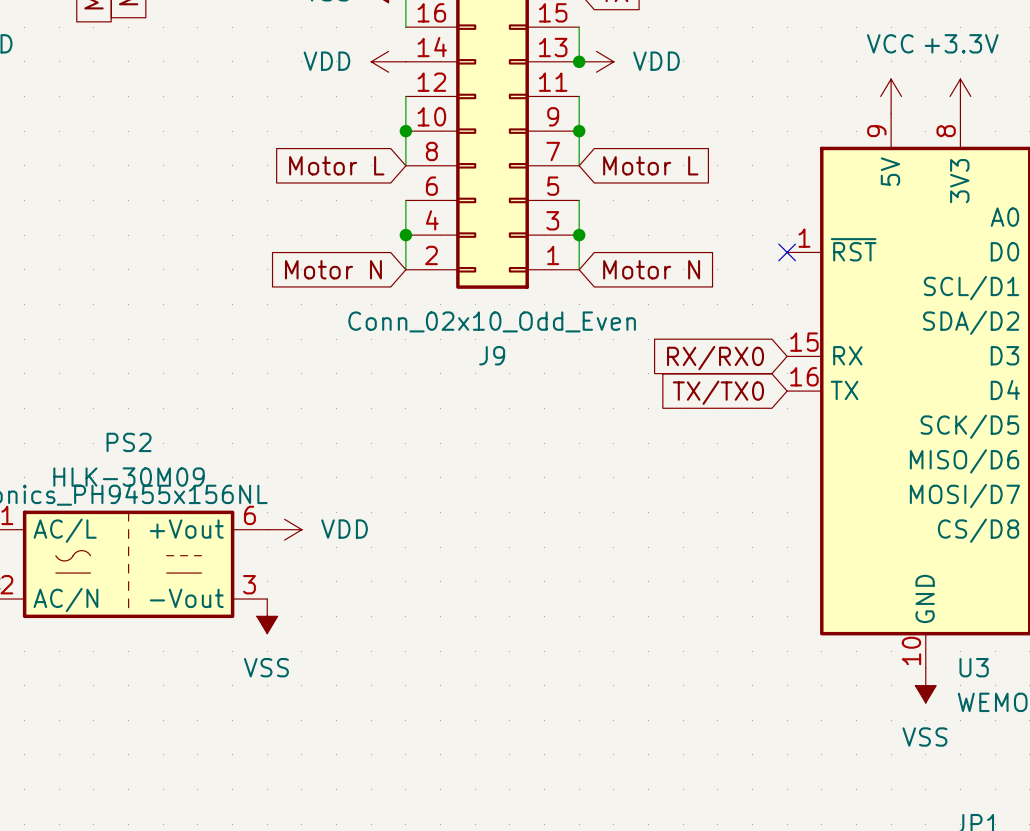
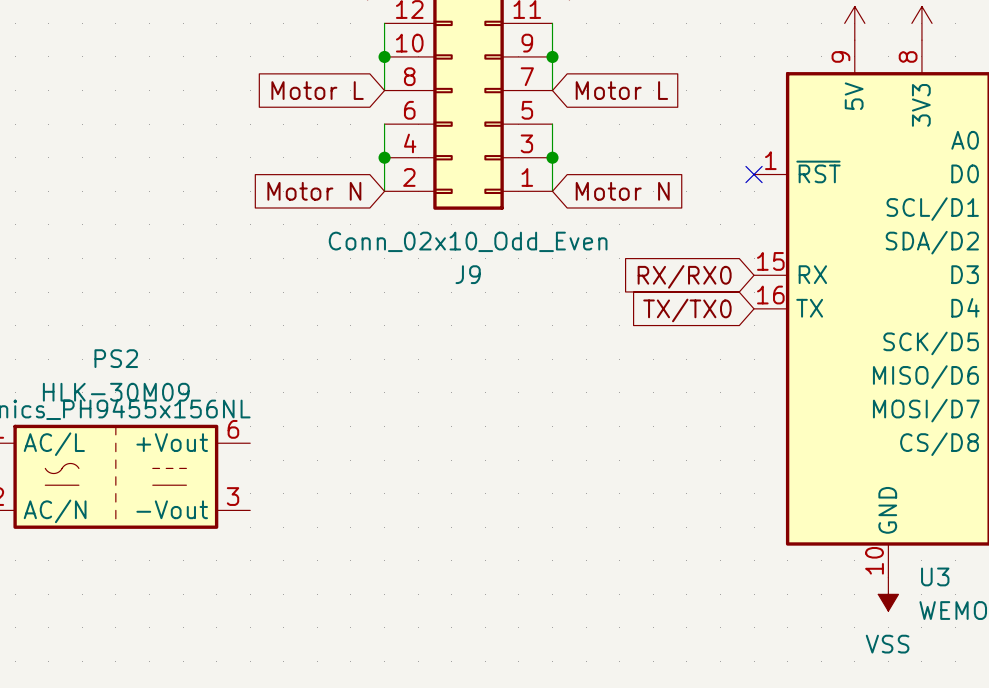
power symbol: VDD (284, 529) -> none
power symbol: VSS (267, 616) -> none

